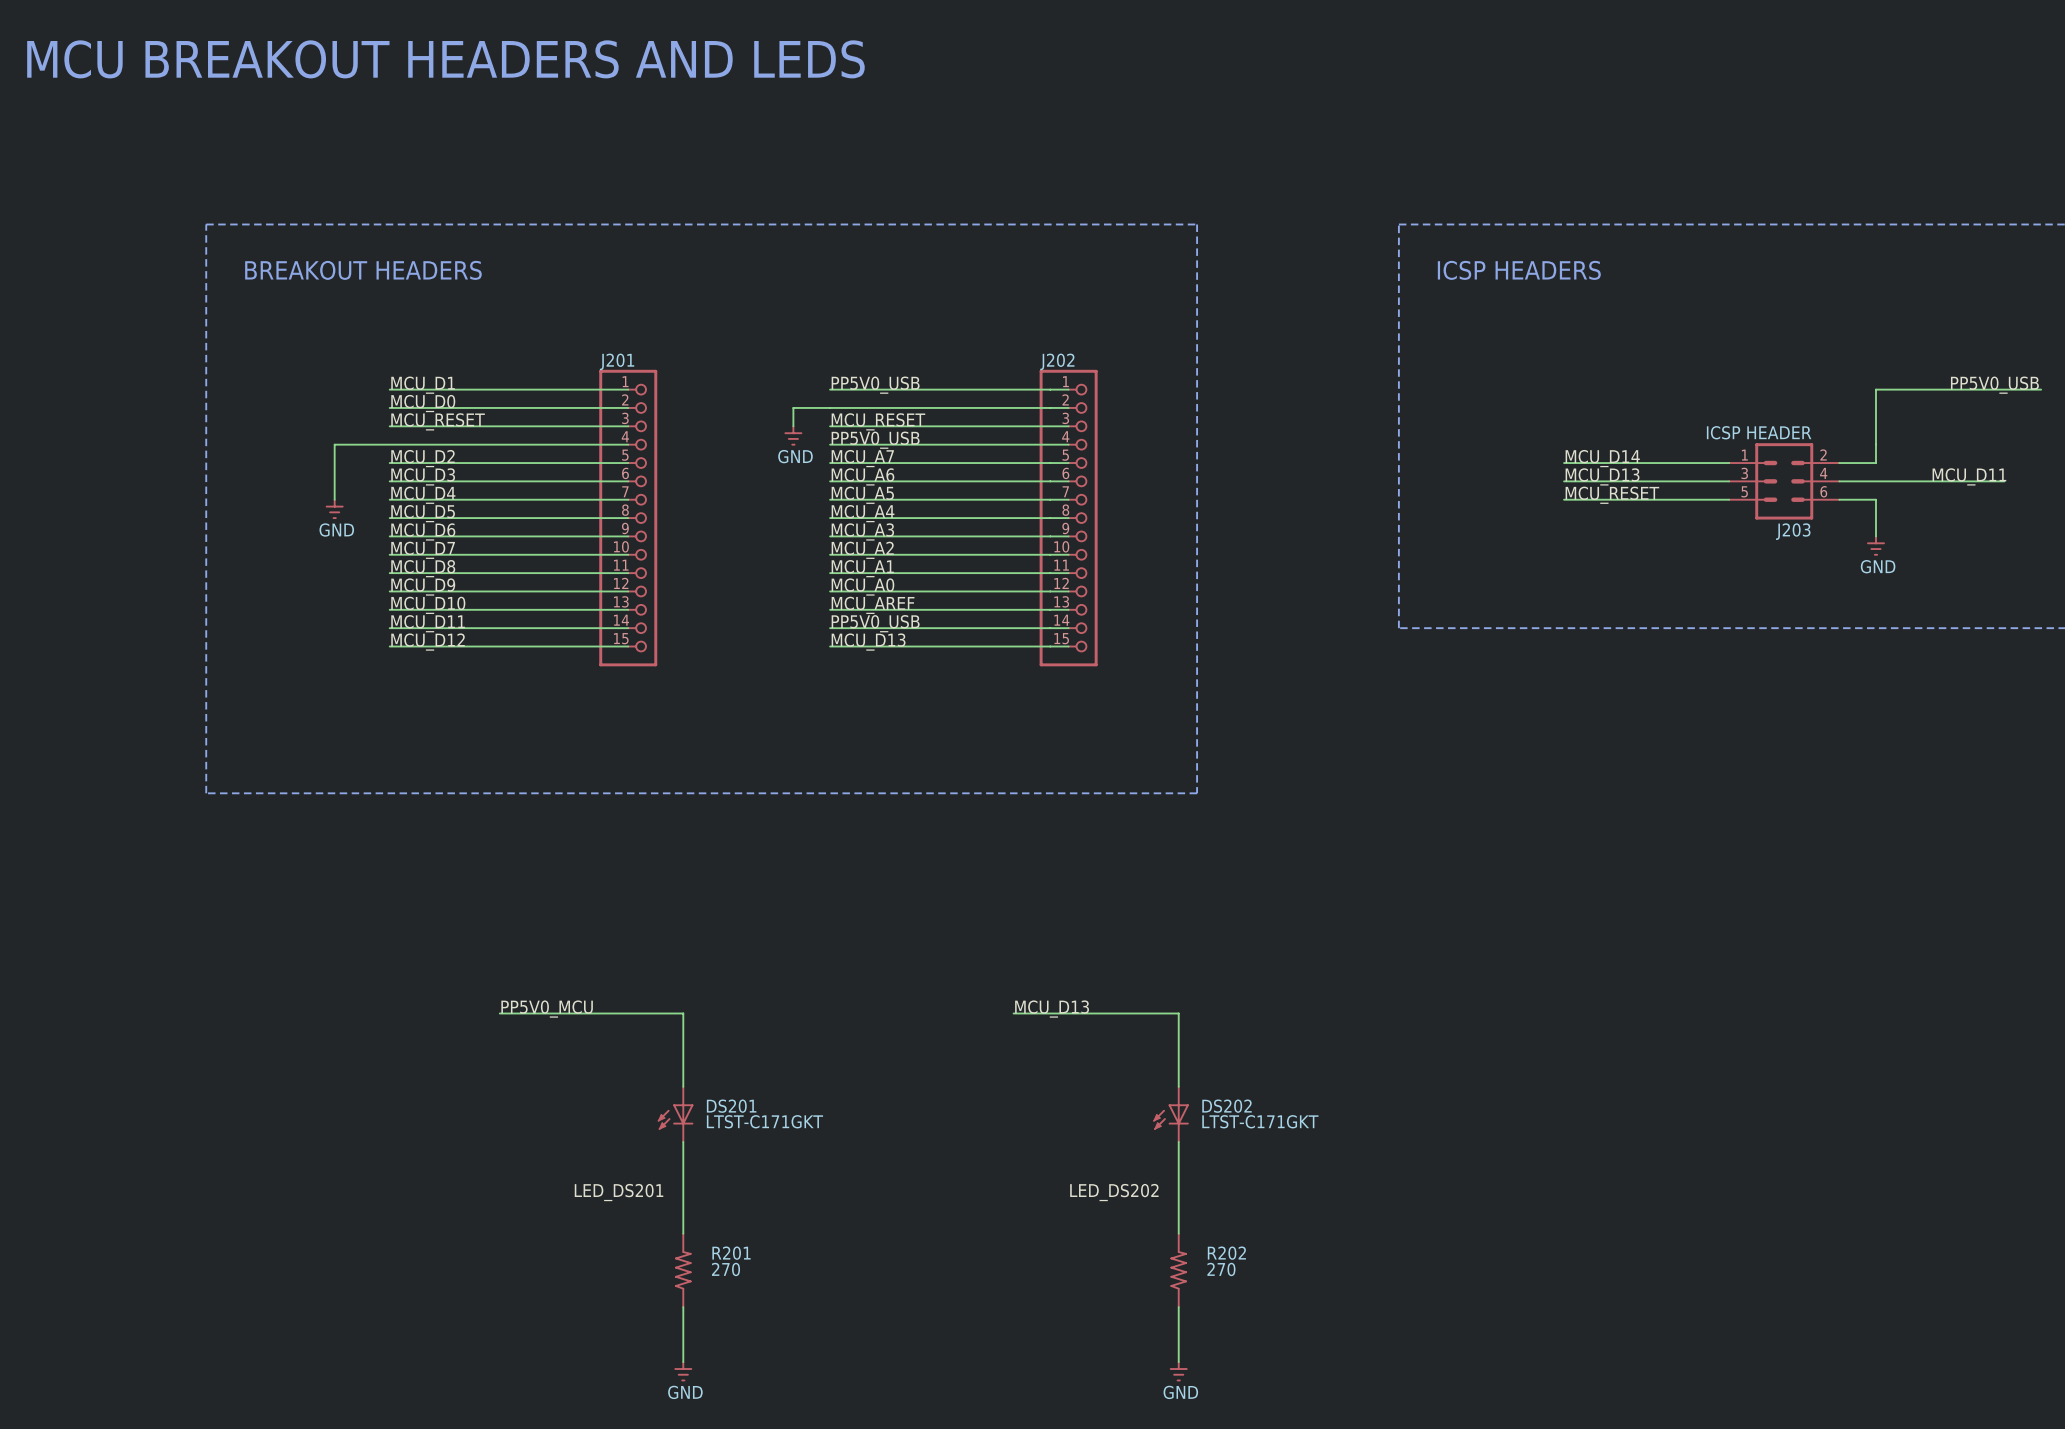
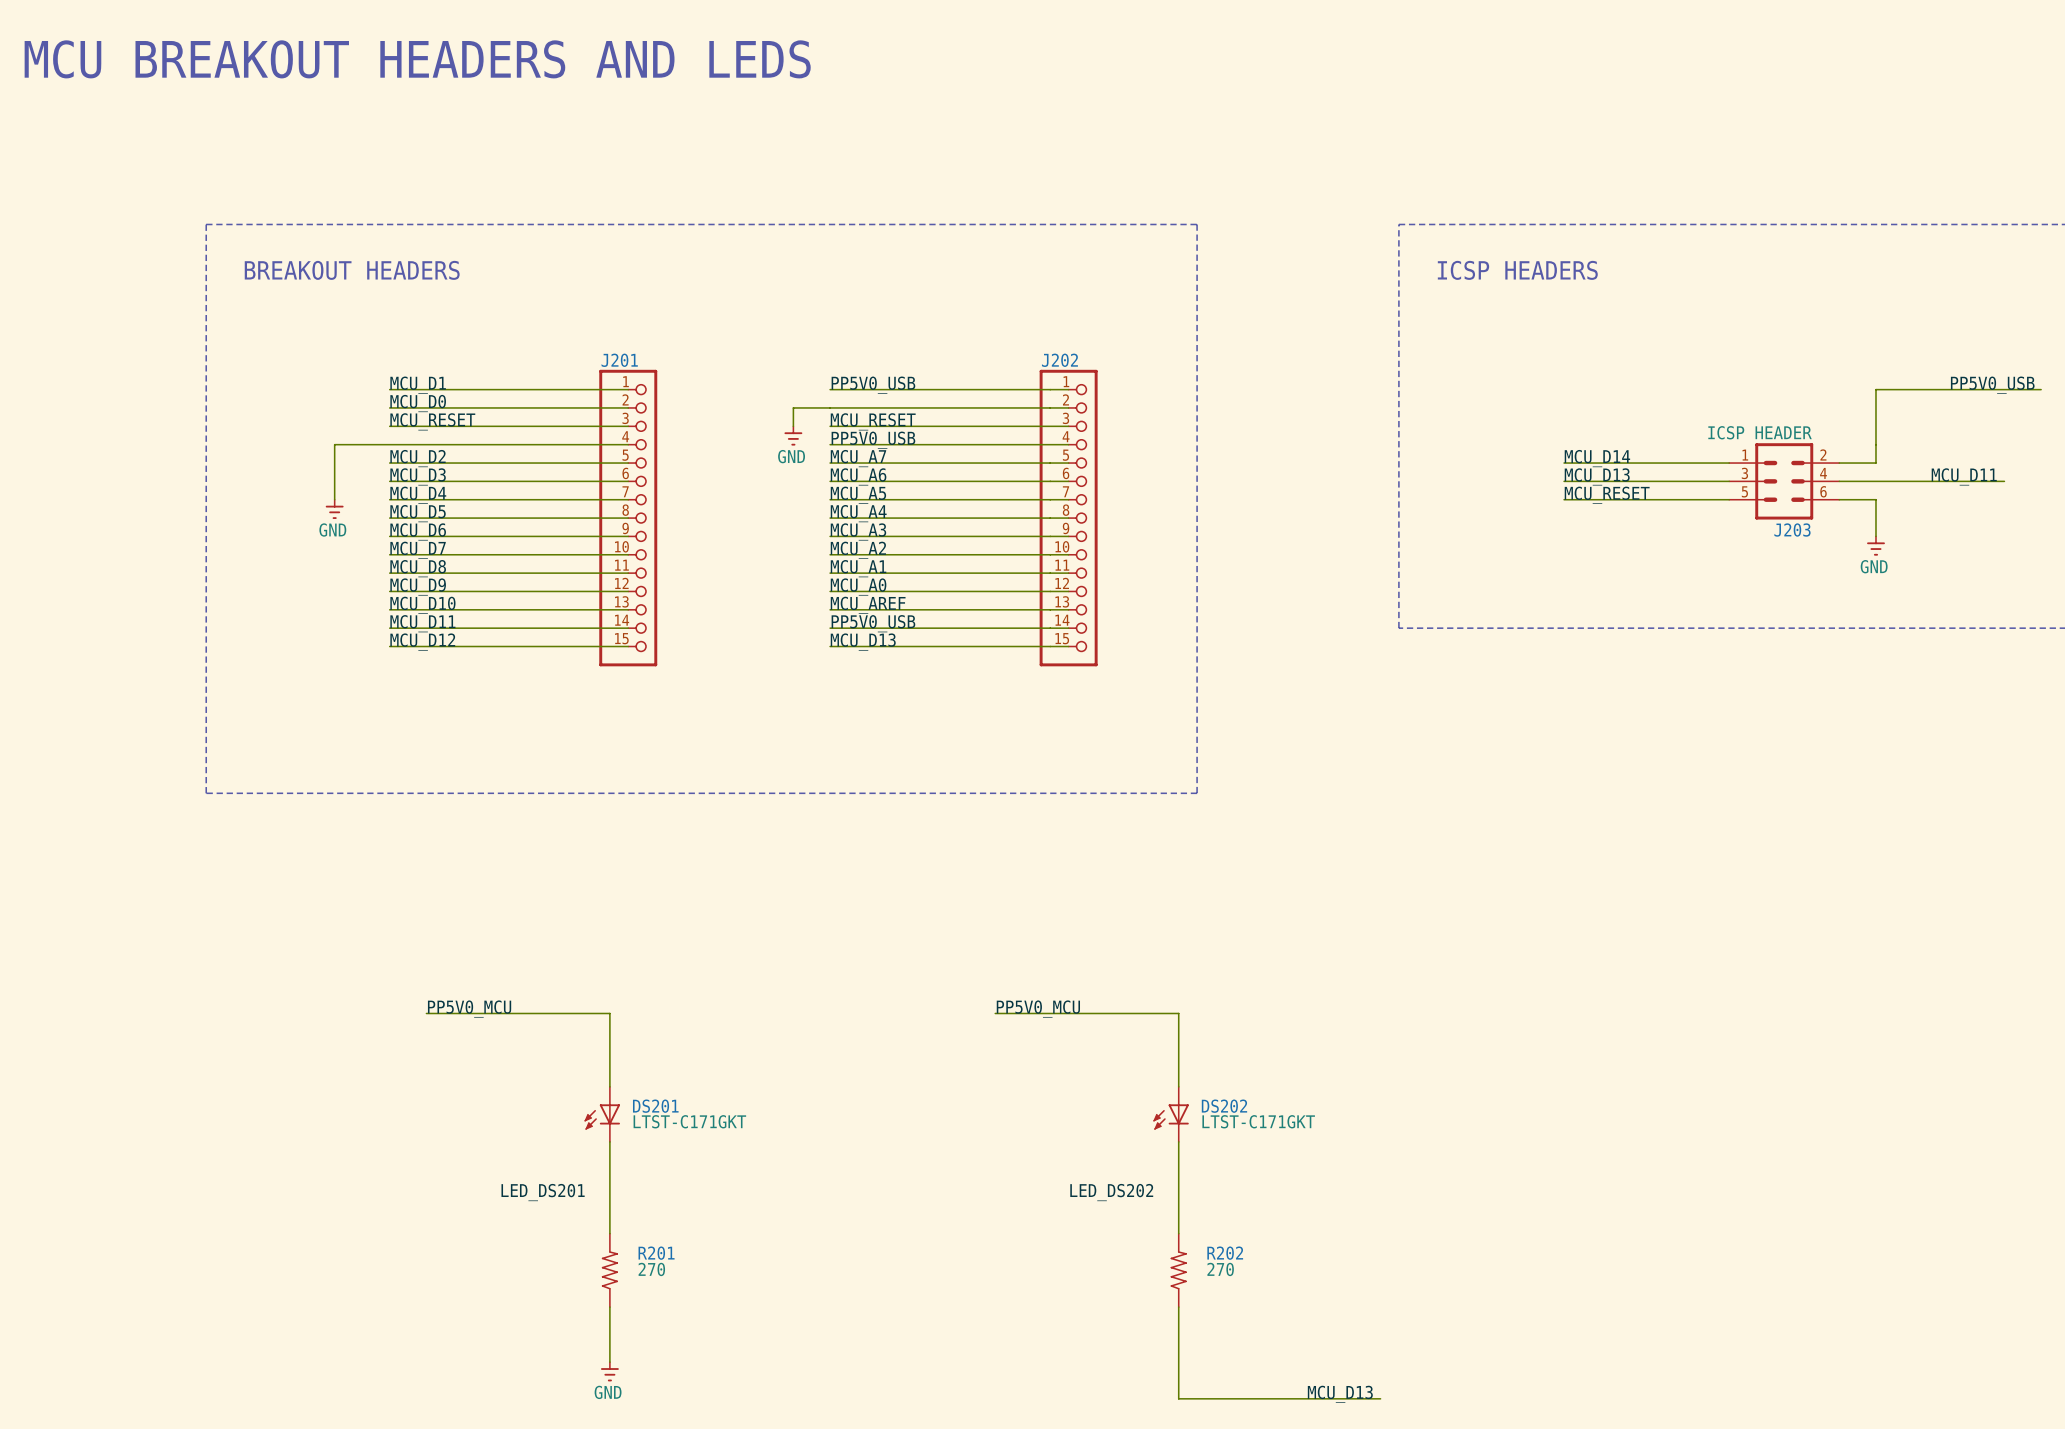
label position: PP5V0_MCU (547, 1009) -> PP5V0_MCU (469, 1009)
label: none -> PP5V0_MCU (1038, 1009)
label: MCU_D13 (1052, 1009) -> none
wire: none -> (426, 1013) (499, 1013)
wire: (609, 1013) (683, 1013) (683, 1086) -> (609, 1013) (609, 1086)
wire: none -> (995, 1013) (1013, 1013)
DS201 position: (675, 1114) -> (602, 1114)
wire: (683, 1141) (683, 1233) -> (609, 1141) (609, 1233)
label position: LED_DS201 (619, 1192) -> LED_DS201 (543, 1192)
R201 position: (683, 1270) -> (609, 1270)
wire: (683, 1307) (683, 1362) -> (609, 1307) (609, 1362)
wire: none -> (1178, 1362) (1178, 1398) (1380, 1398)
power symbol position: GND (683, 1371) -> GND (609, 1371)
power symbol: GND (1178, 1371) -> none
label: none -> MCU_D13 (1340, 1394)

